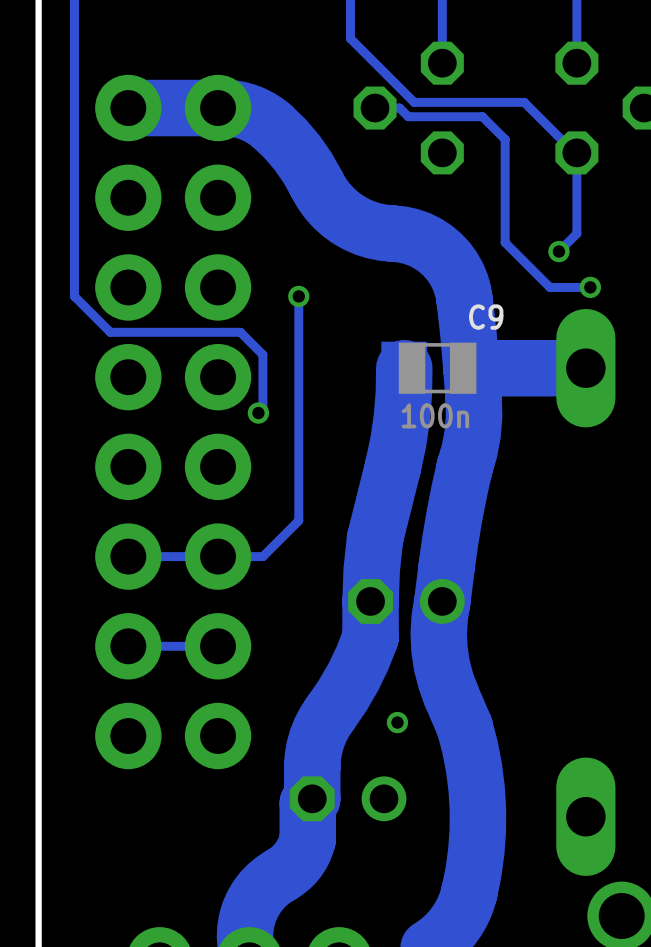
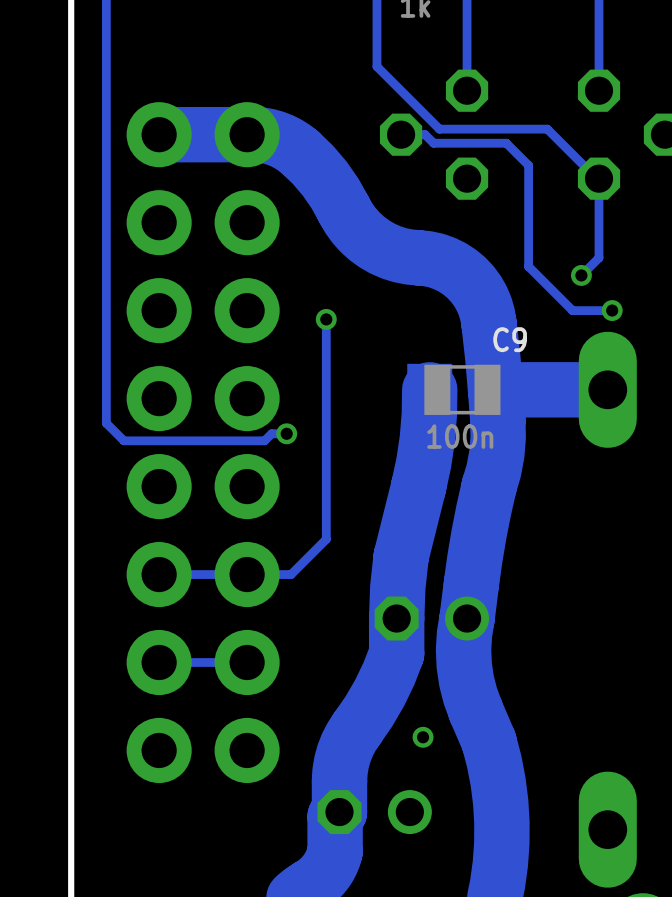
track: (74, 296) (110, 332) (240, 332) (262, 354) (262, 408) (258, 413) -> (106, 319) (106, 423) (123, 440) (264, 440) (271, 433) (286, 433)

